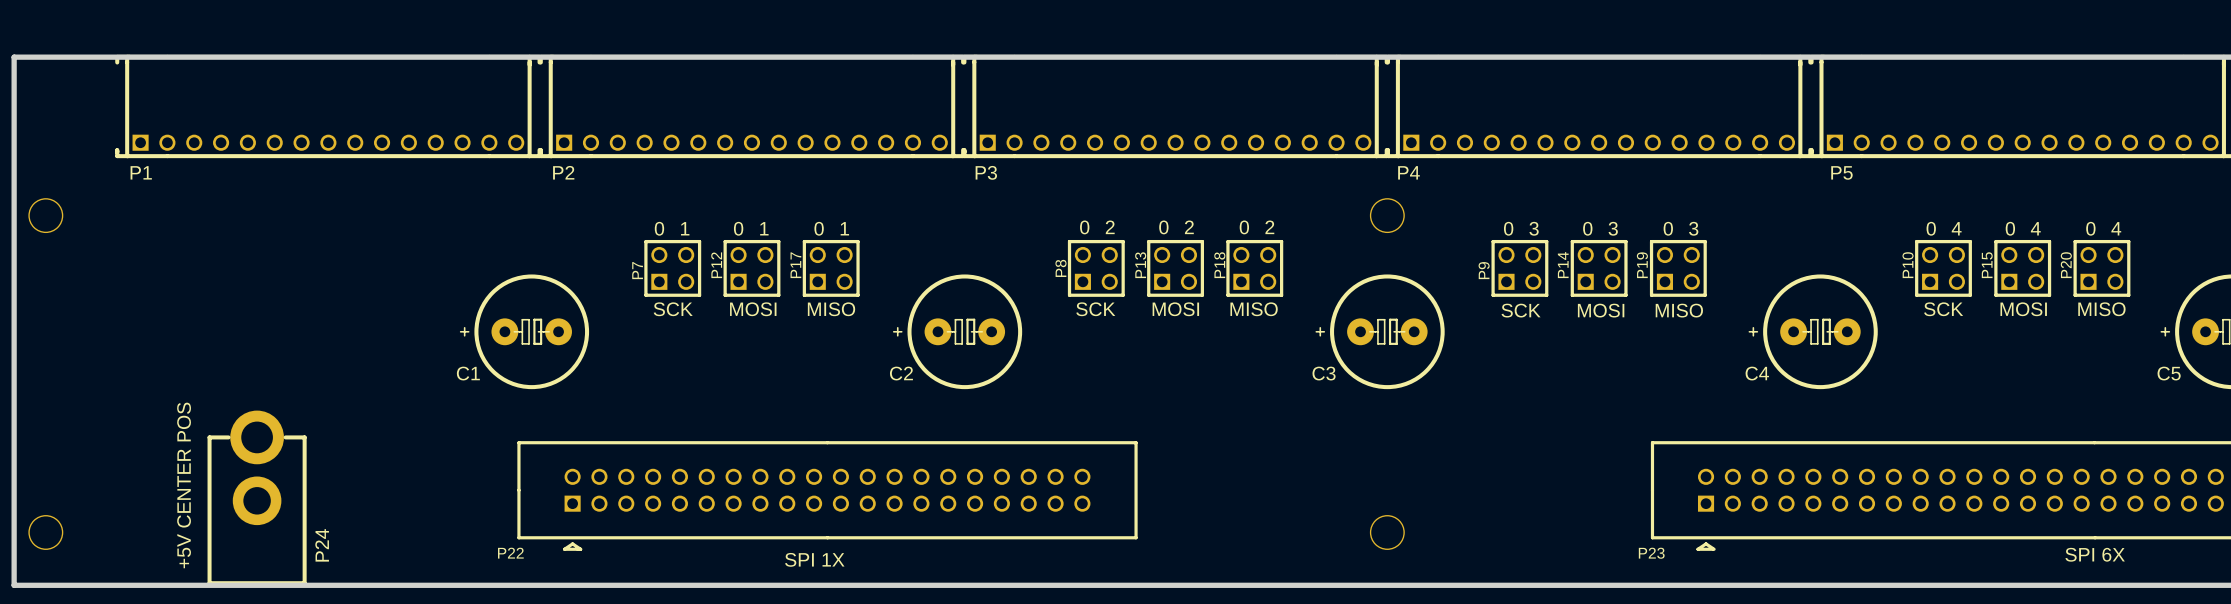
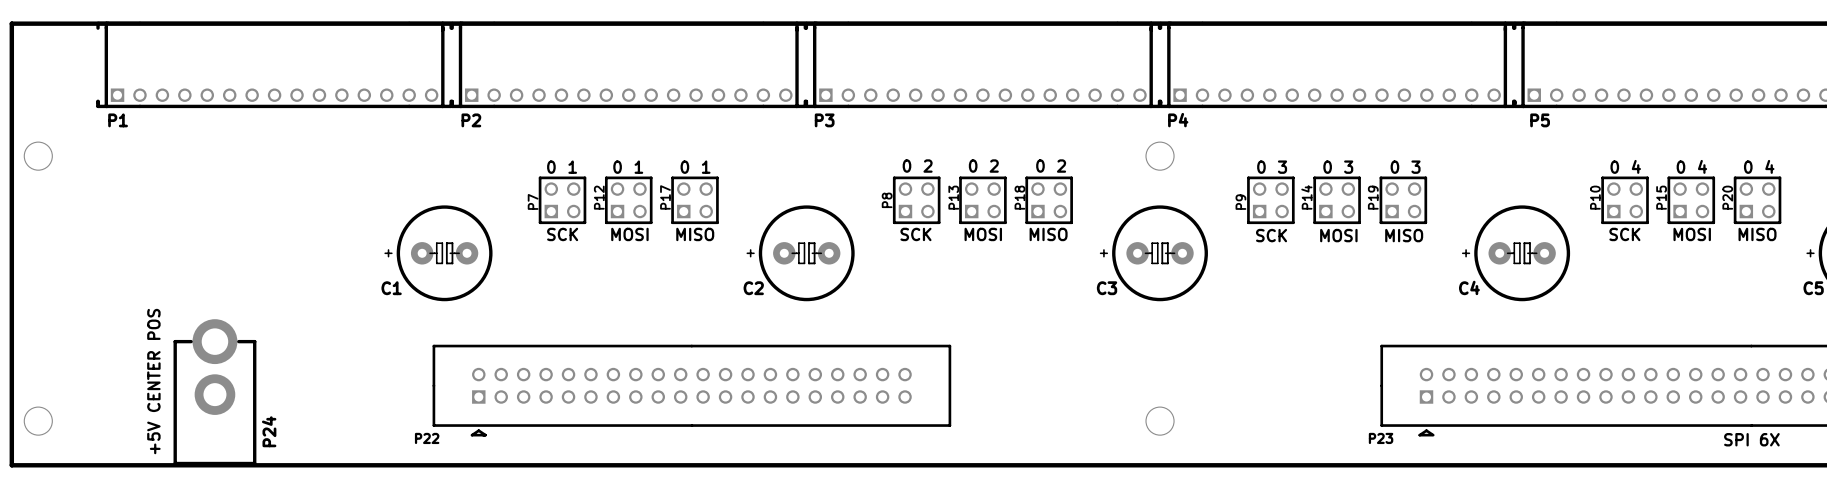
text: SPI 1X (814, 559) -> none

